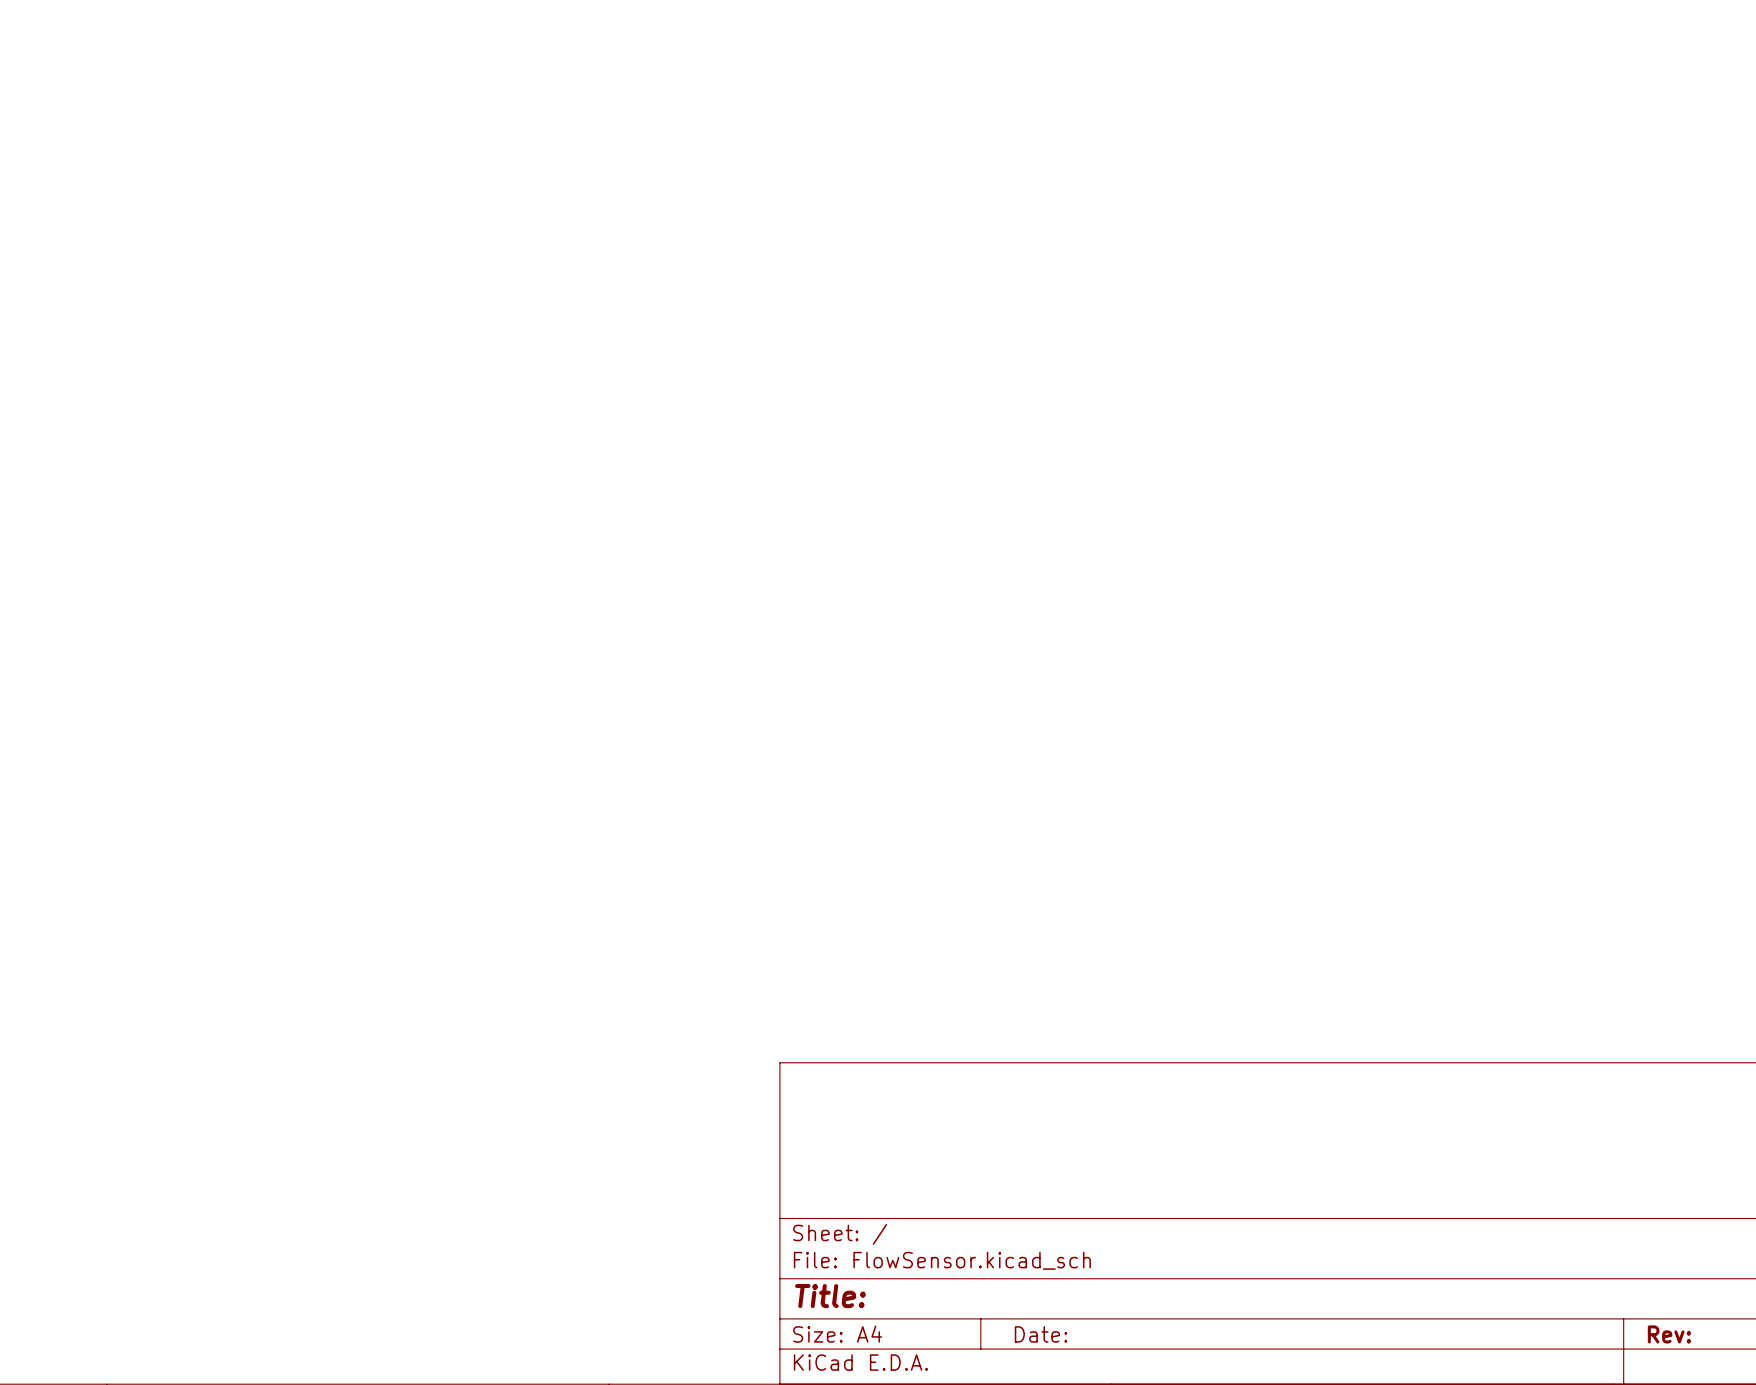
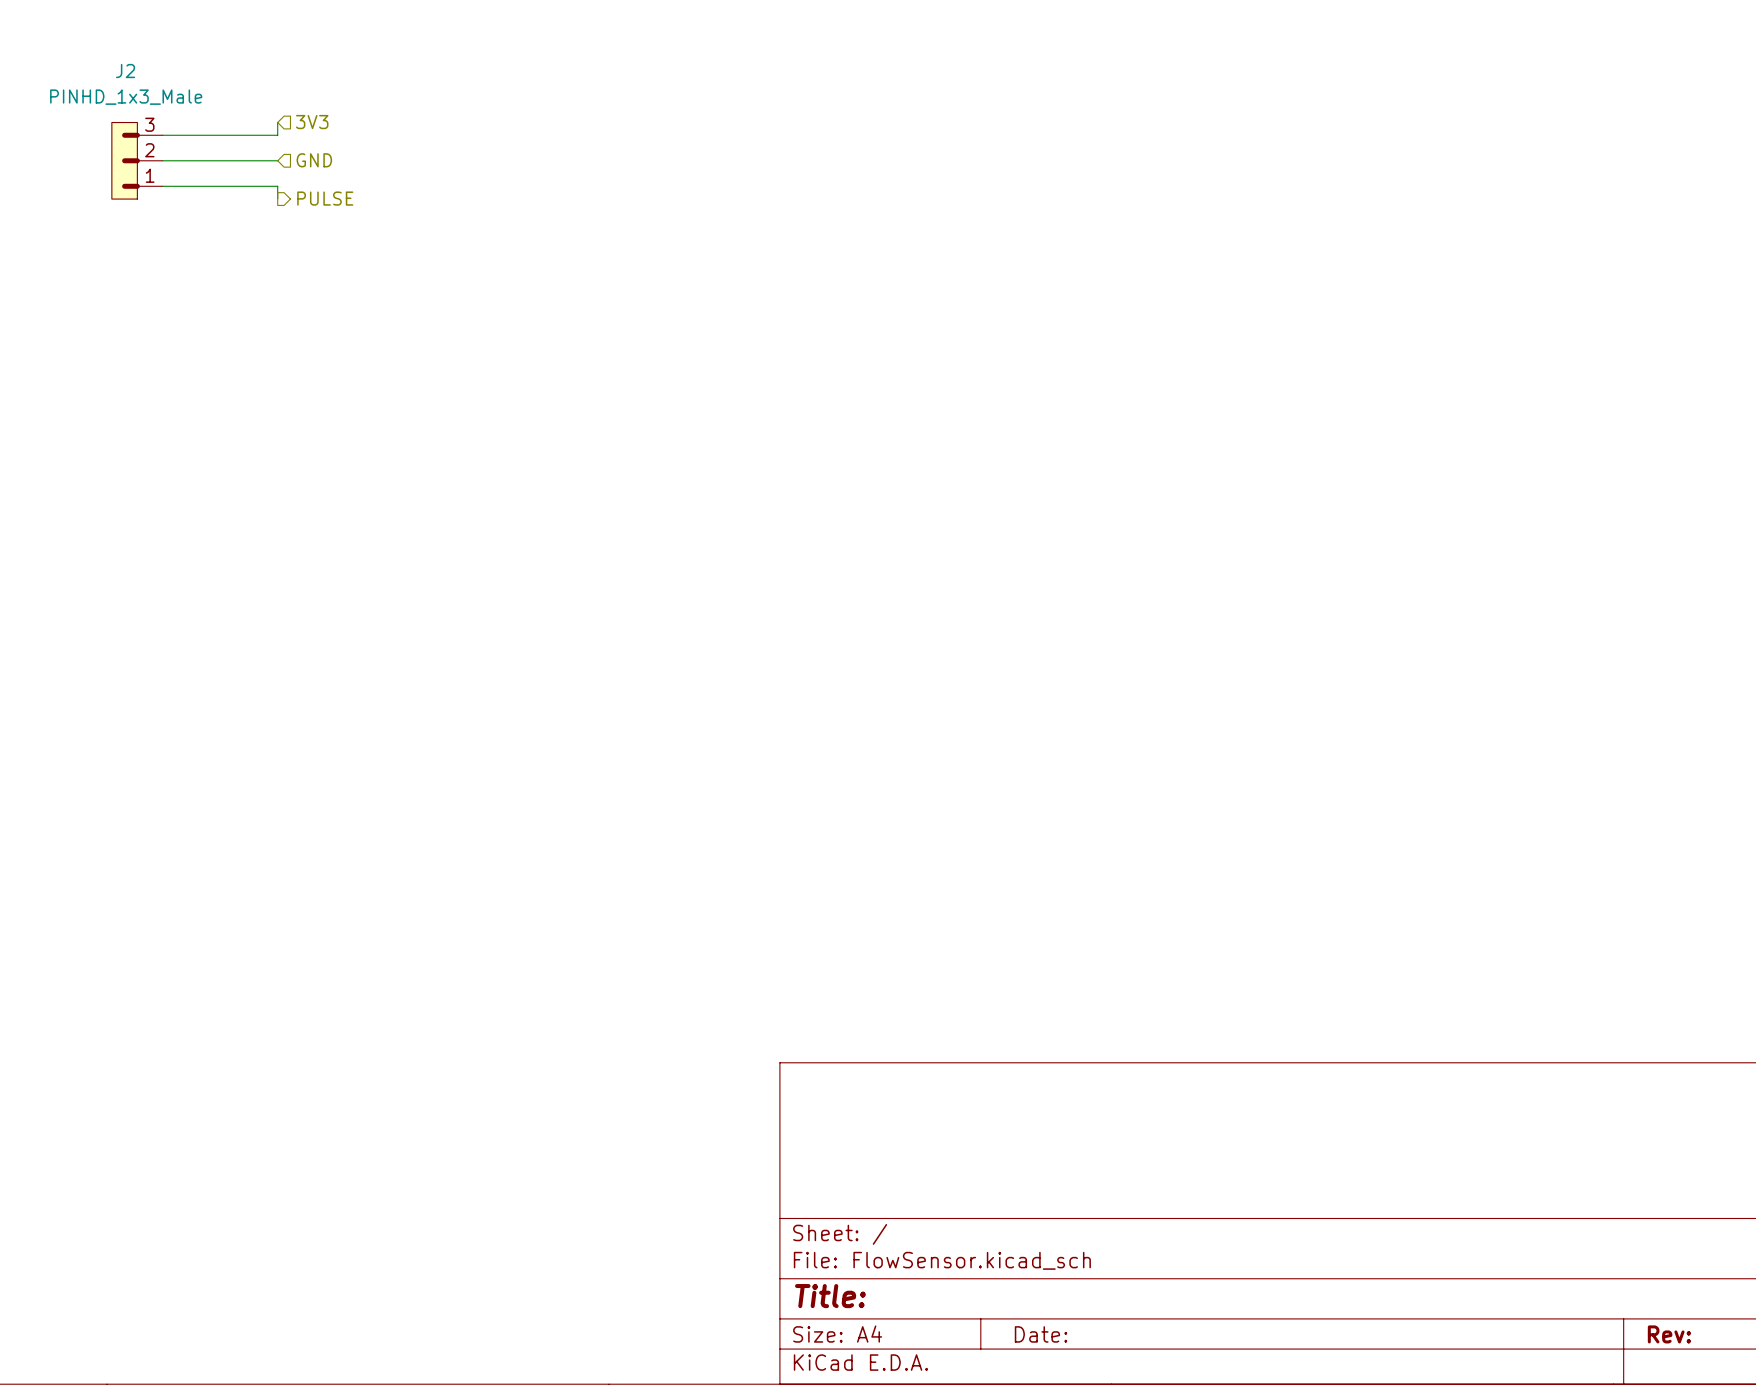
wire: none -> (277, 122) (277, 135) (162, 135)
hierarchical label: none -> 3V3 (312, 122)
J2: none -> PINHD_1x3_Male (137, 160)
wire: none -> (162, 160) (277, 160)
hierarchical label: none -> GND (314, 160)
wire: none -> (162, 186) (277, 186) (277, 199)
hierarchical label: none -> PULSE (325, 198)

